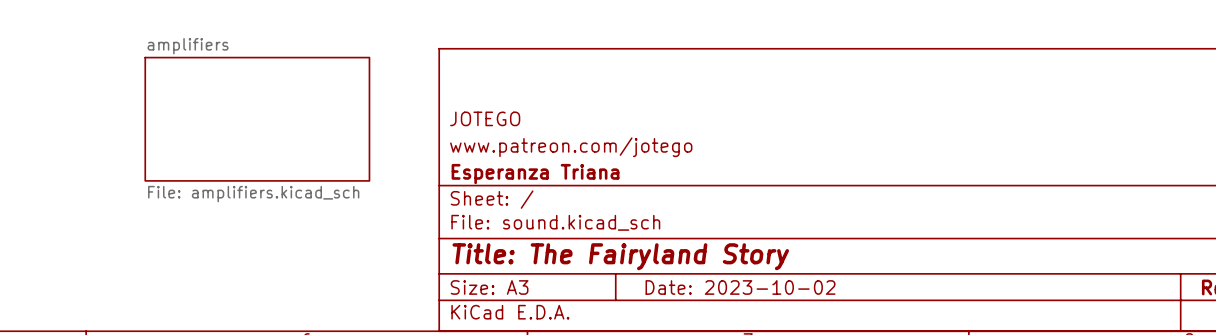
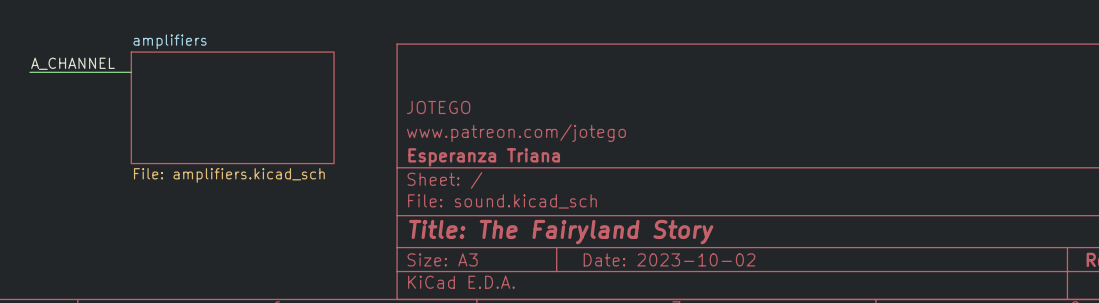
label: none -> A_CHANNEL (73, 63)
wire: none -> (29, 72) (131, 72)

